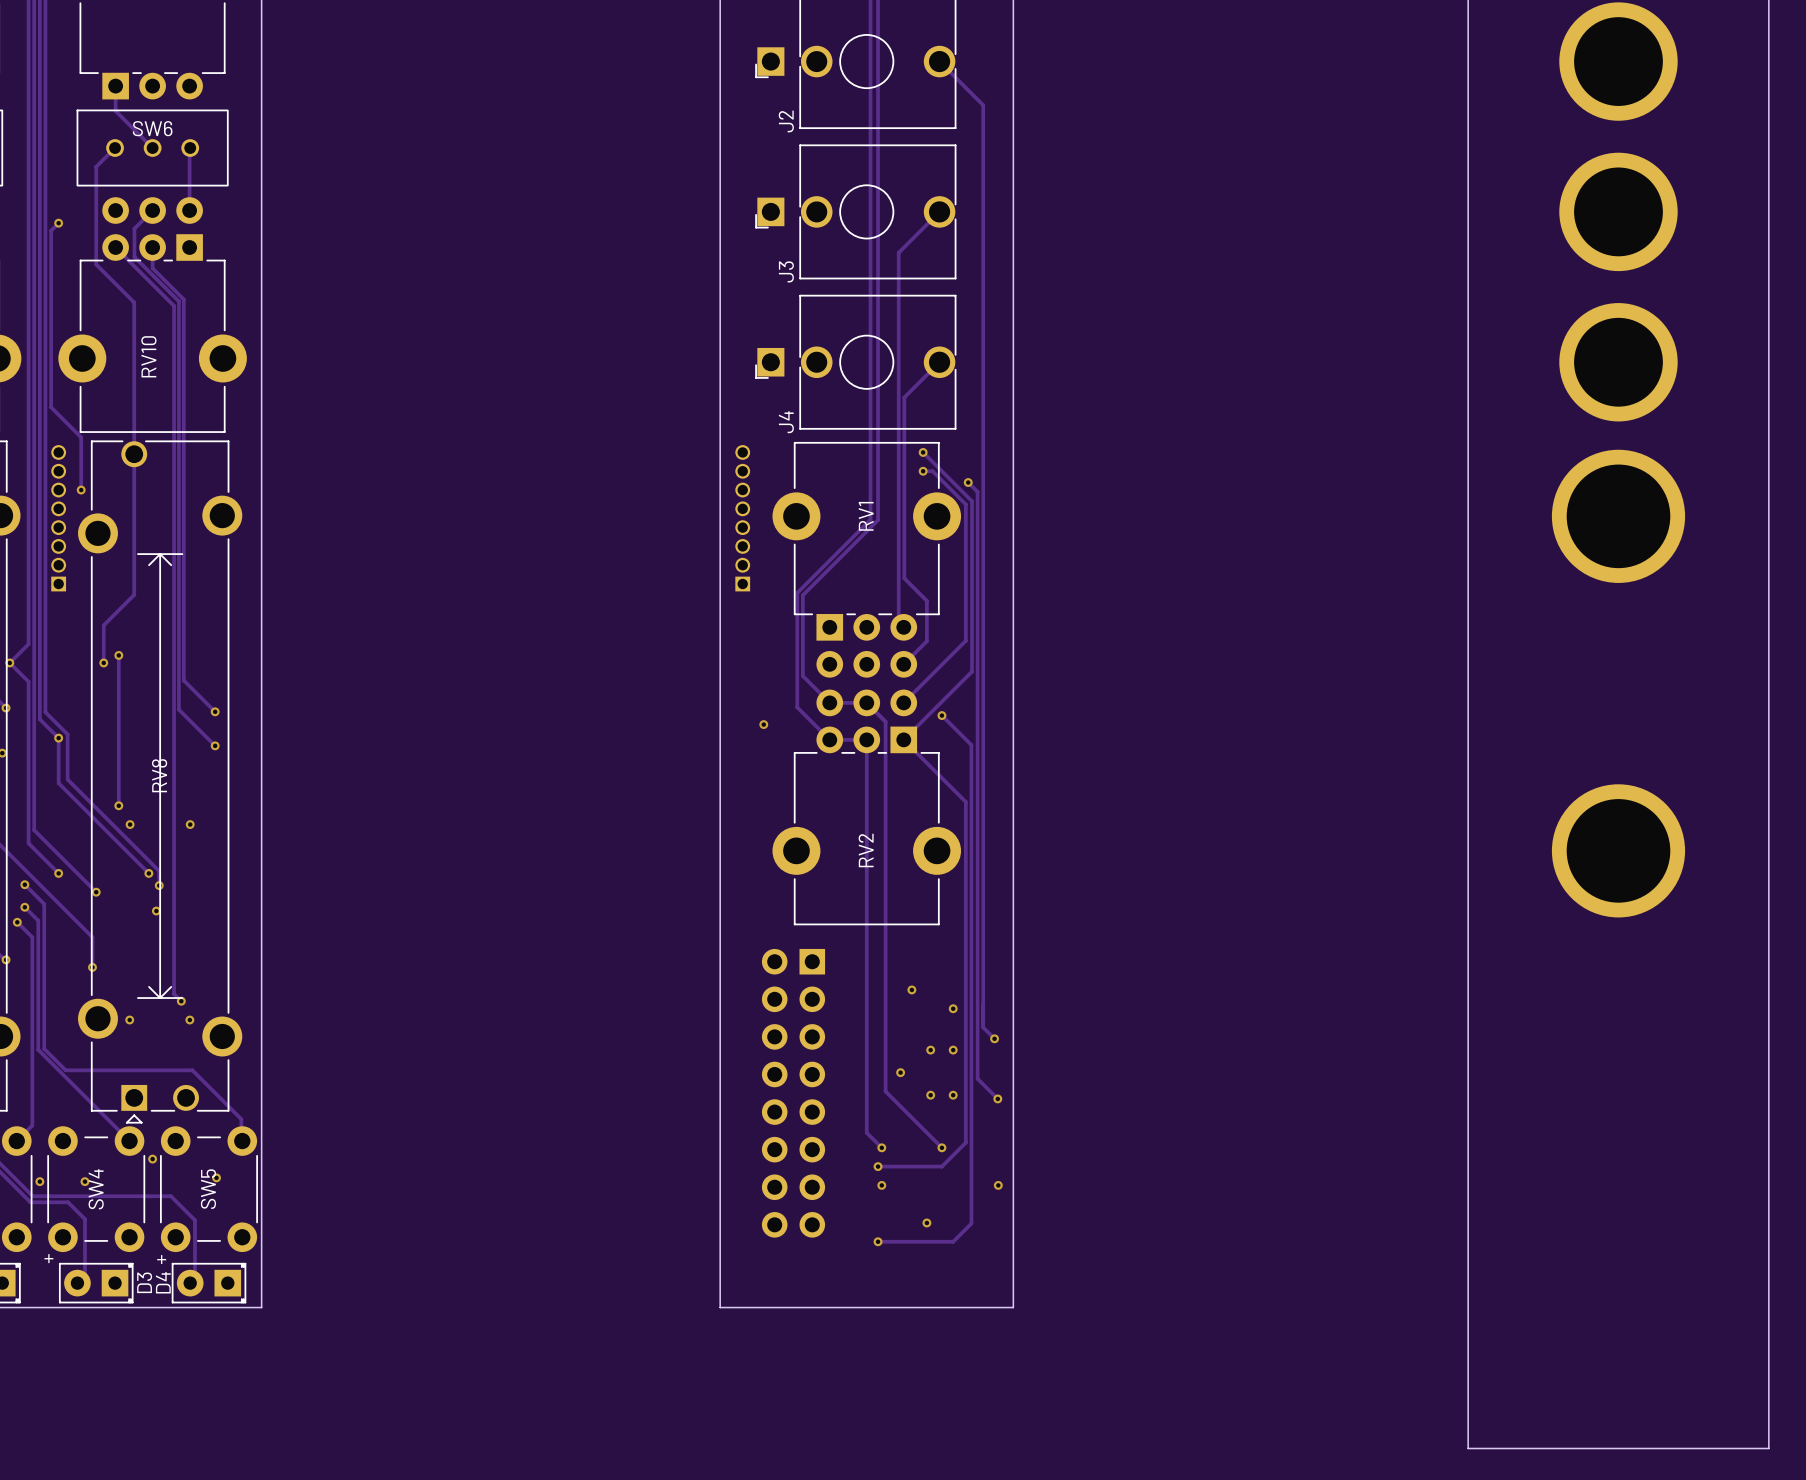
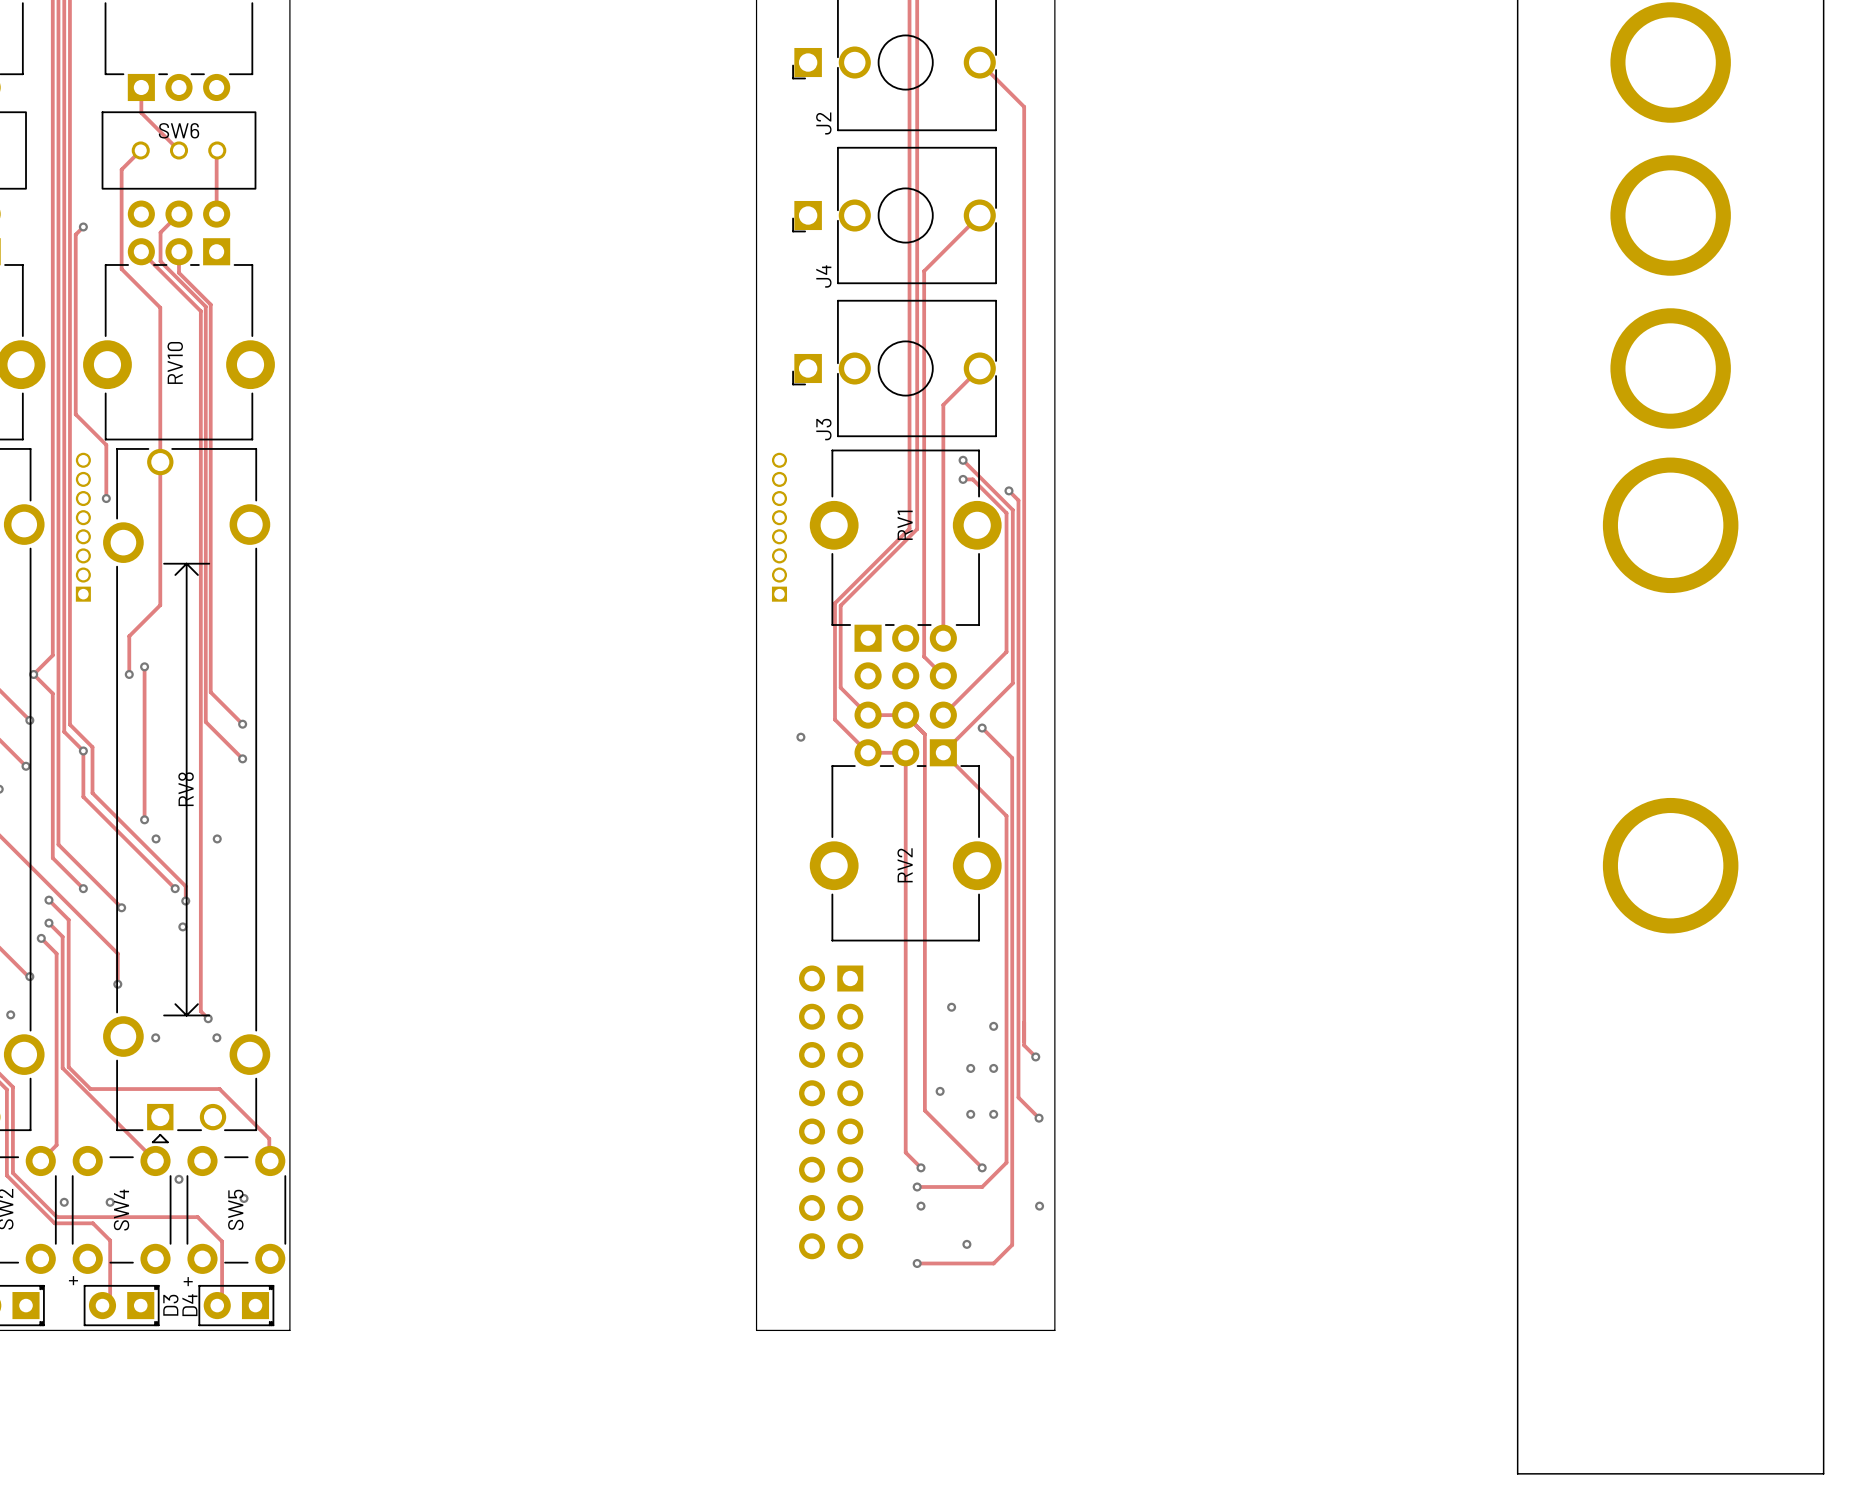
track: (898, 252) (898, 622) (903, 627) -> (938, 257) (924, 271) (924, 656) (943, 675)
J3 name: J3 (786, 271) -> J4 (823, 276)
track: (904, 397) (904, 578) (926, 600) (926, 641) (903, 664) -> (943, 404) (943, 638)
J4 name: J4 (786, 422) -> J3 (823, 429)

